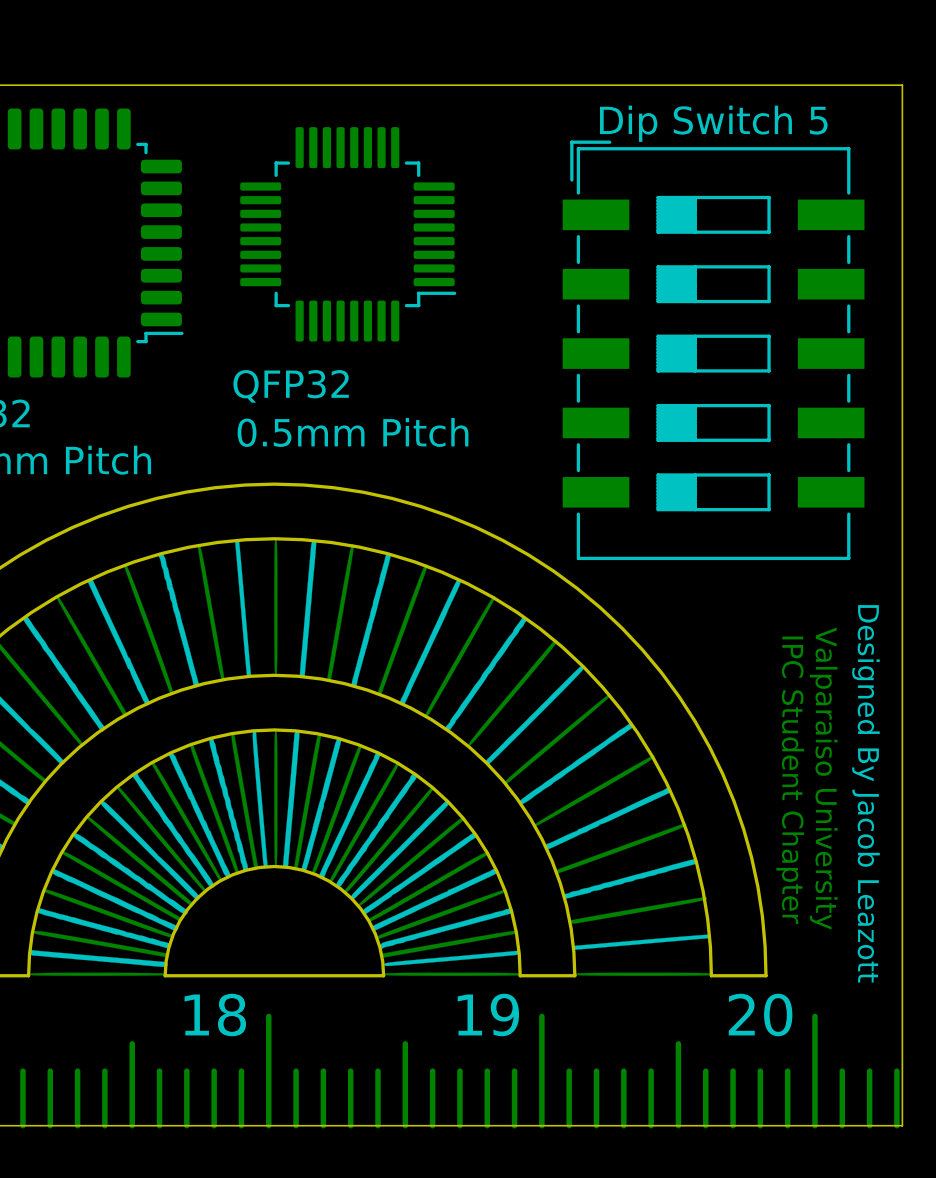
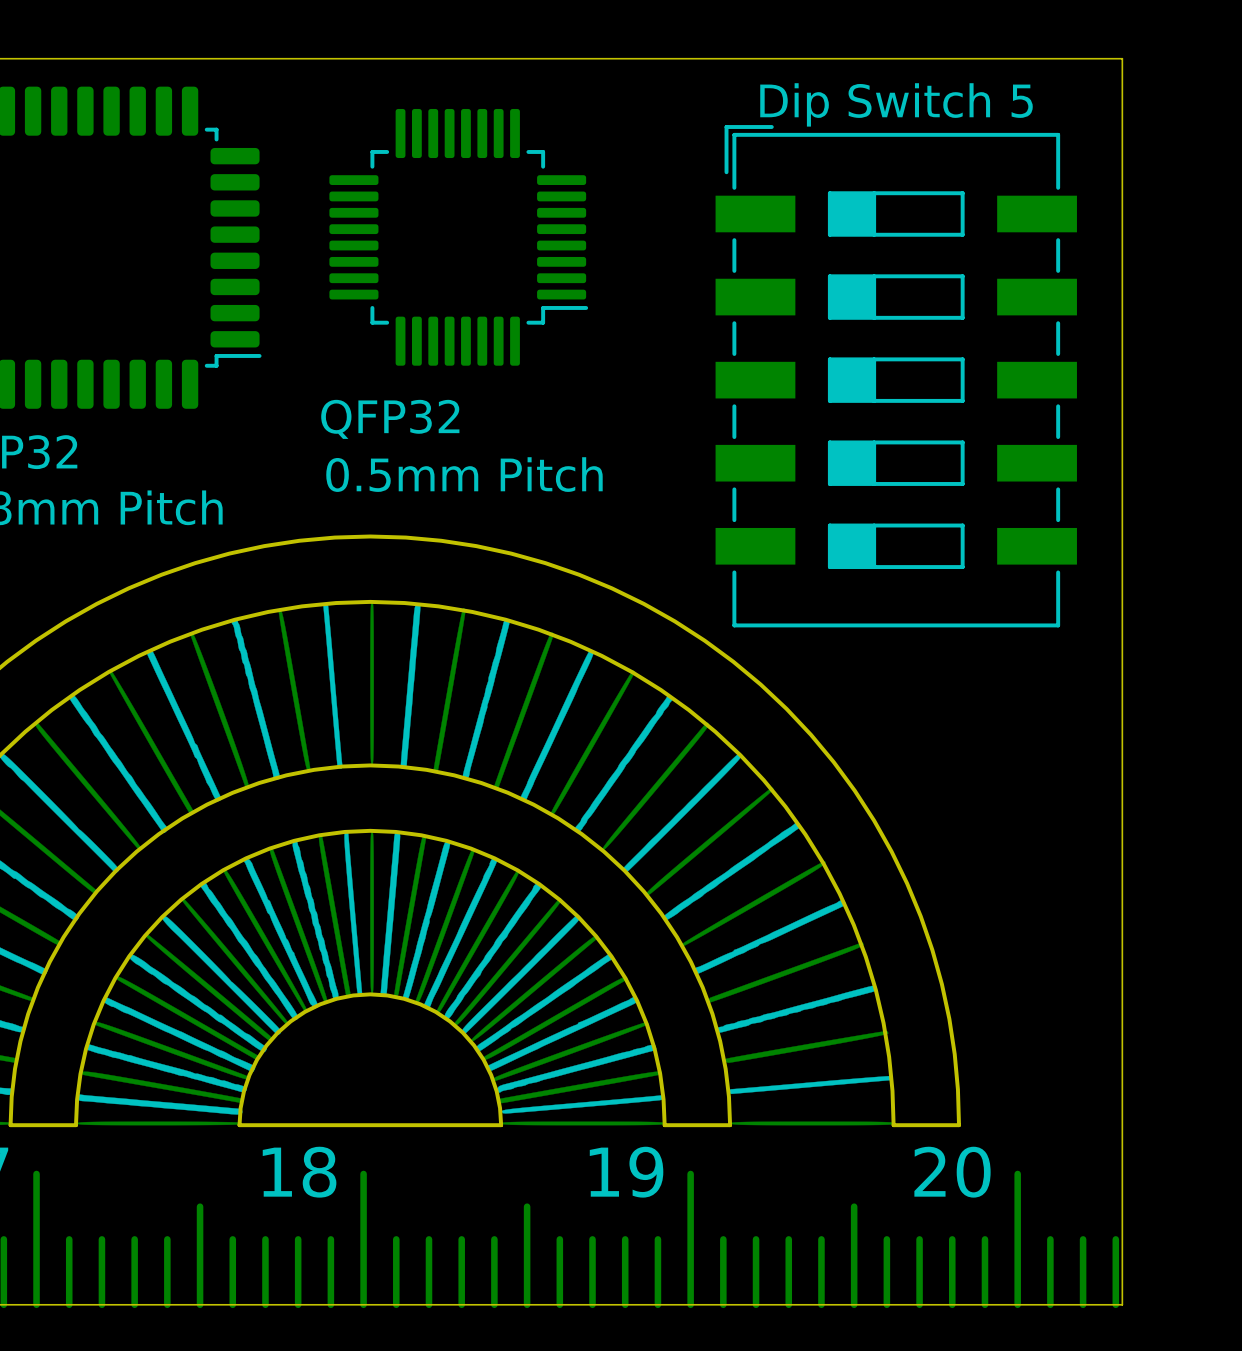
text: Valparaiso University (823, 778) -> none
text: IPC Student Chapter (790, 780) -> none
text: Designed By Jacob Leazott (865, 793) -> none

